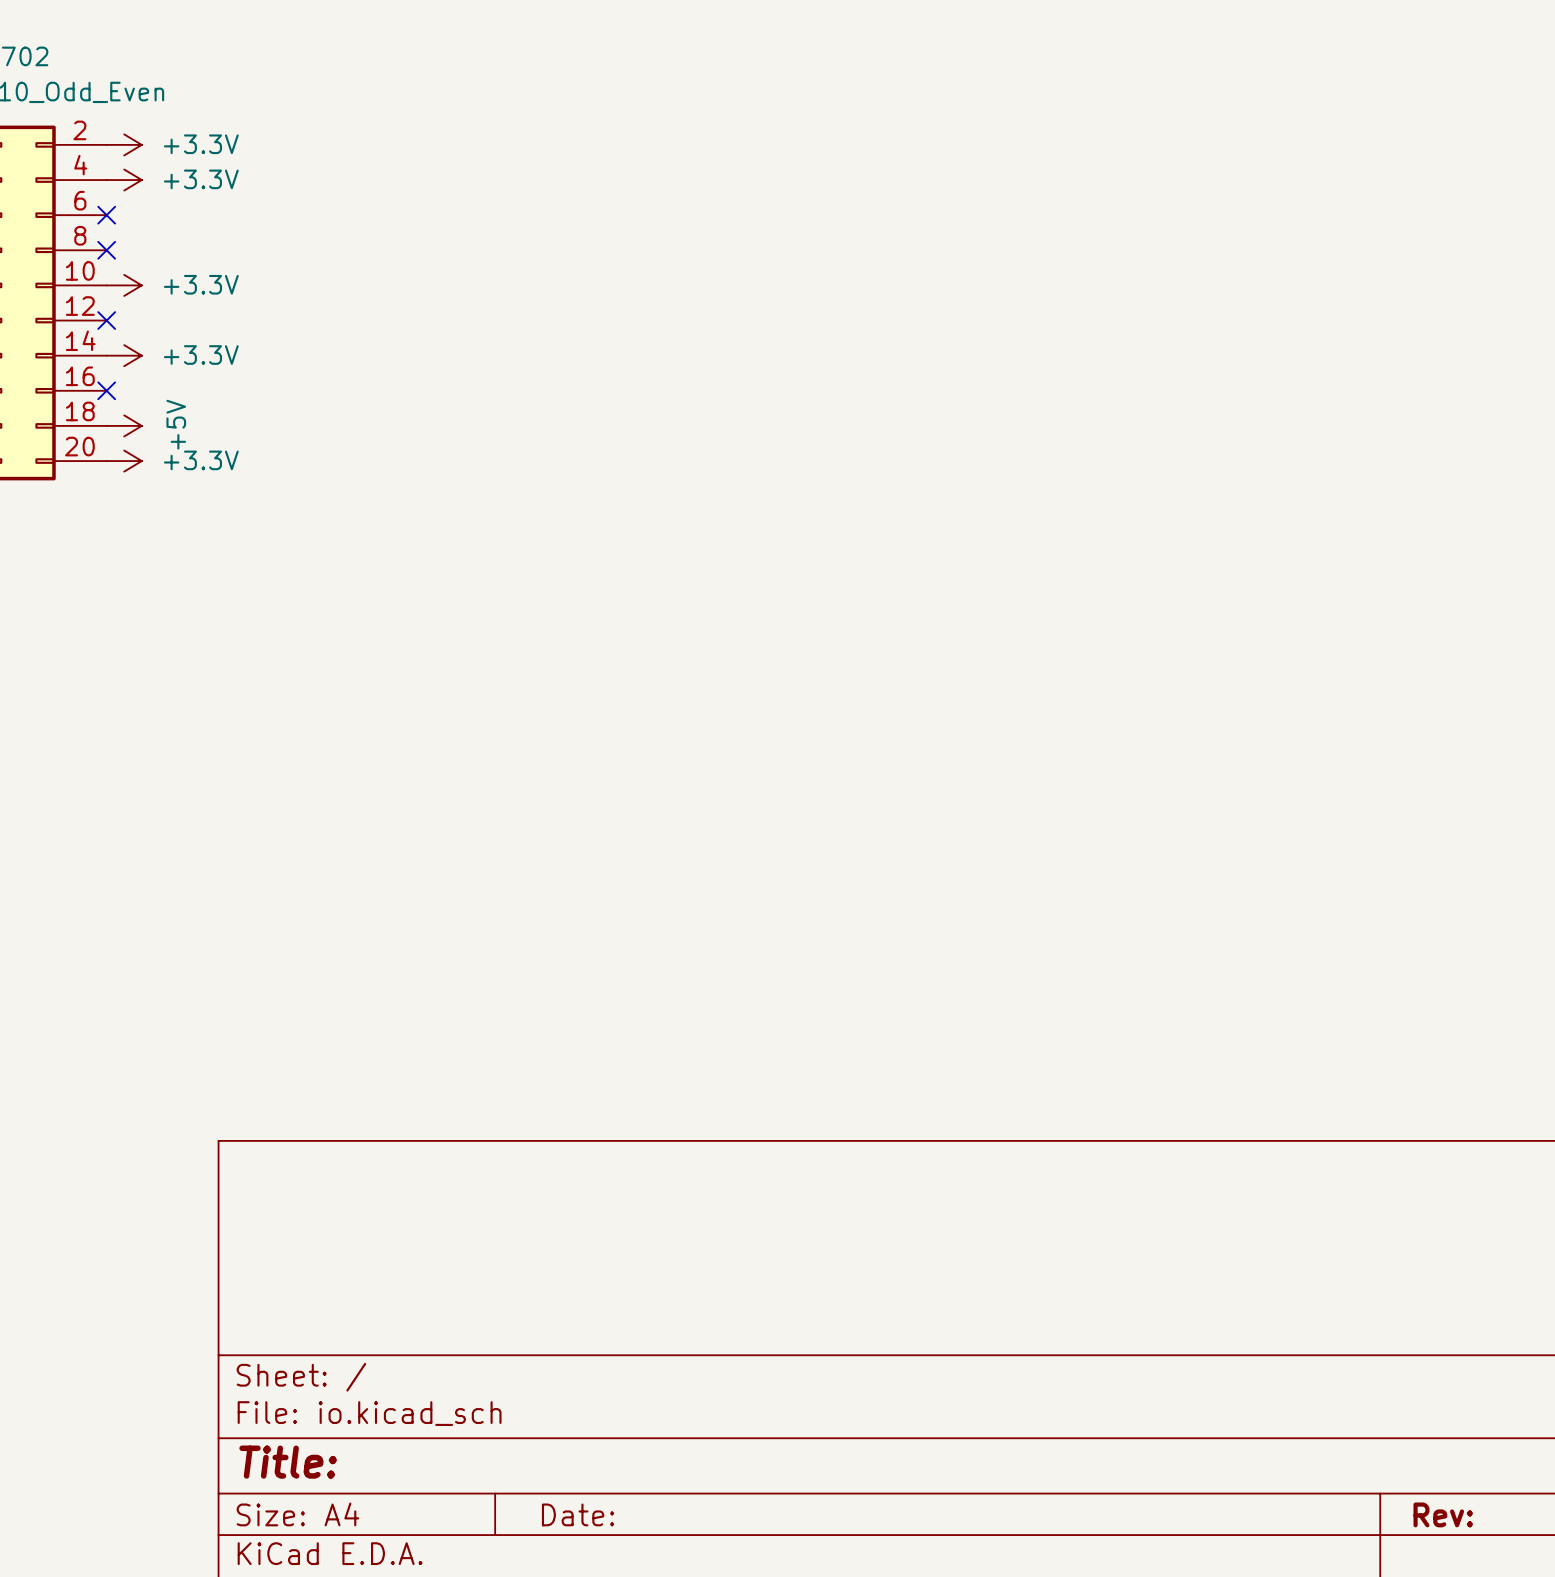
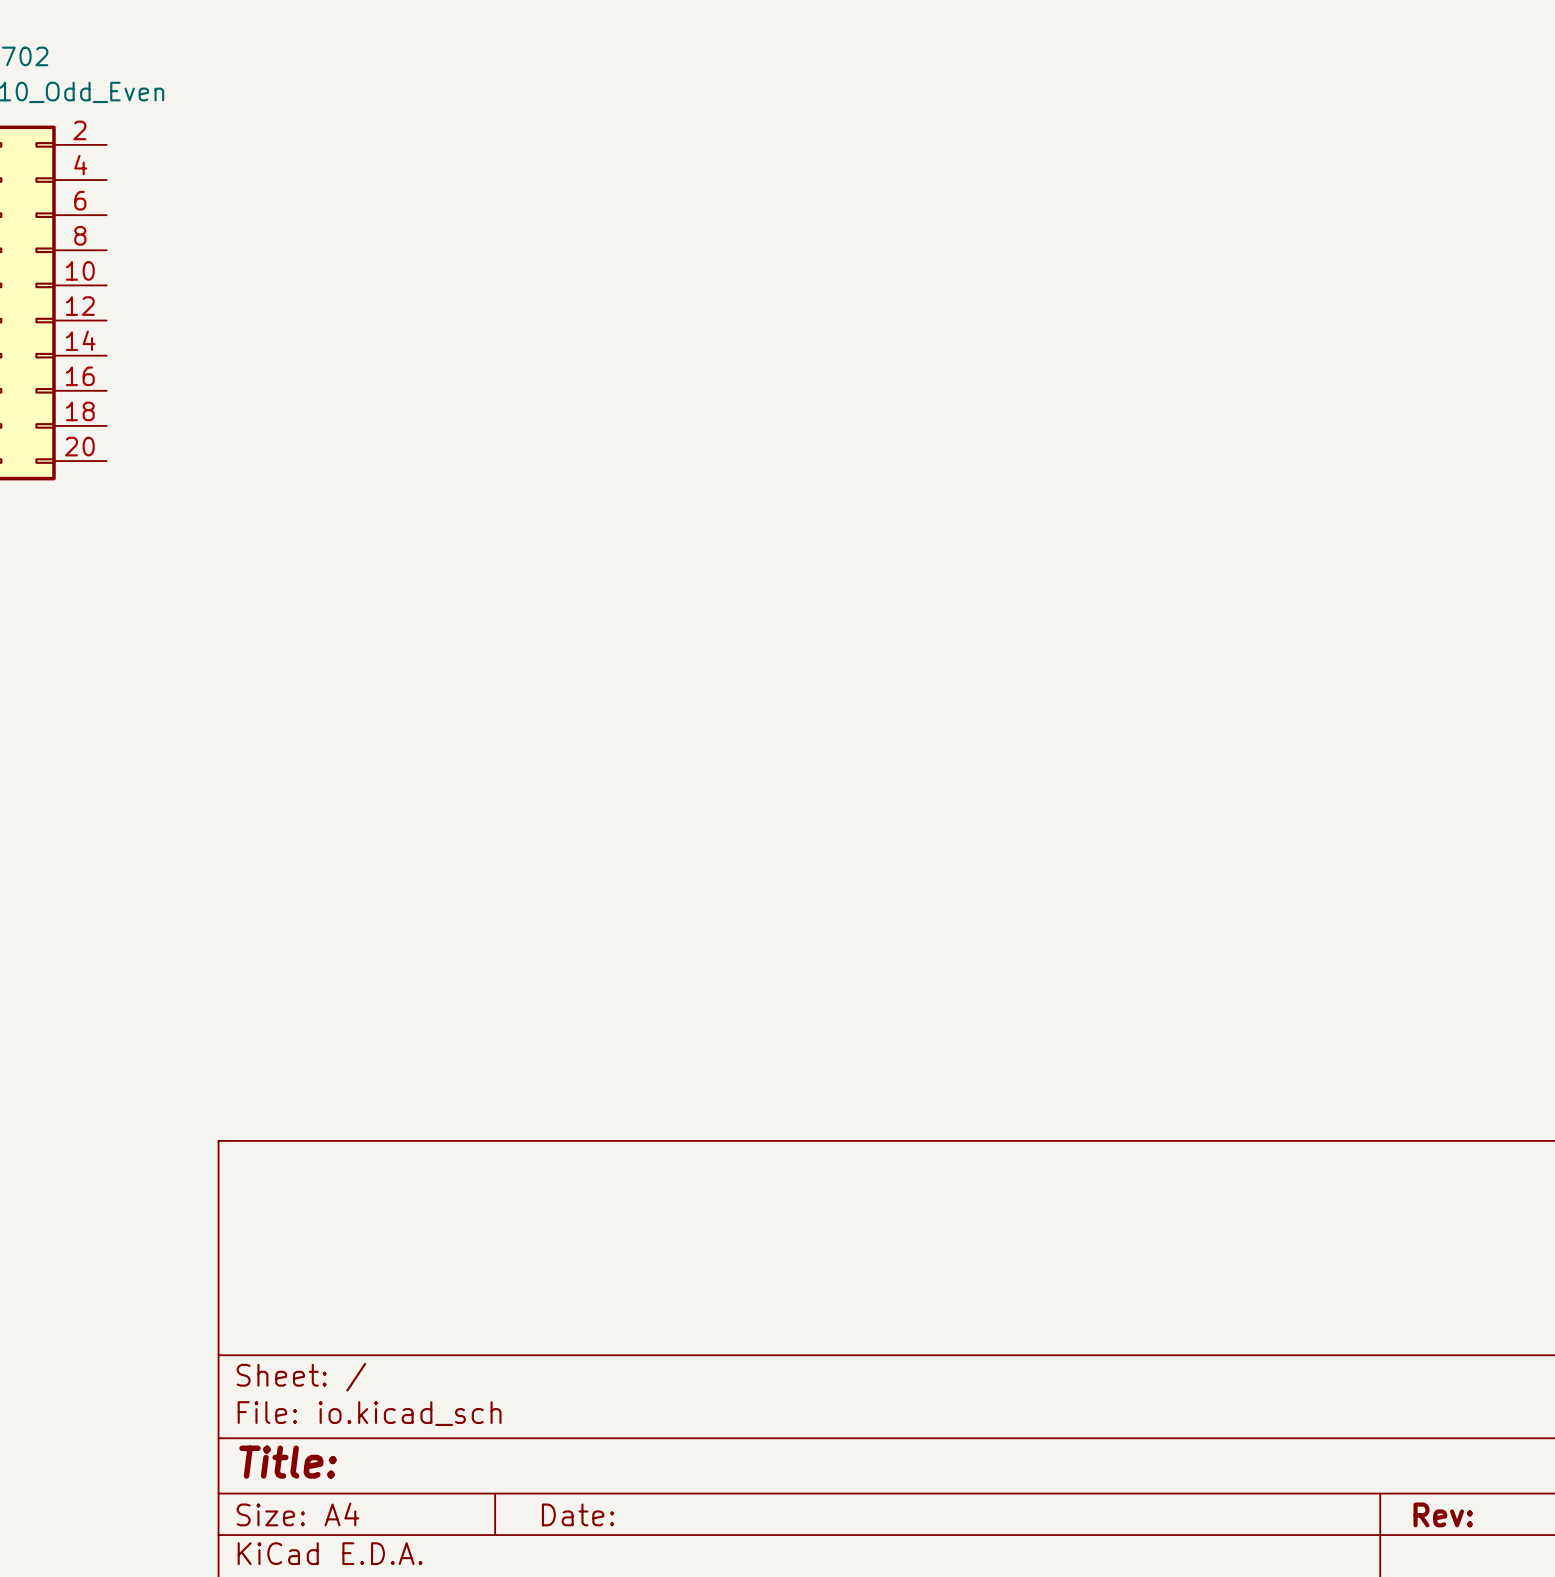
power symbol: +3.3V (124, 144) -> none
power symbol: +3.3V (124, 180) -> none
no-connect mark: (106, 215) -> none
no-connect mark: (106, 250) -> none
power symbol: +3.3V (124, 285) -> none
no-connect mark: (106, 320) -> none
power symbol: +3.3V (124, 355) -> none
no-connect mark: (106, 390) -> none
power symbol: +5V (124, 425) -> none
power symbol: +3.3V (124, 461) -> none

